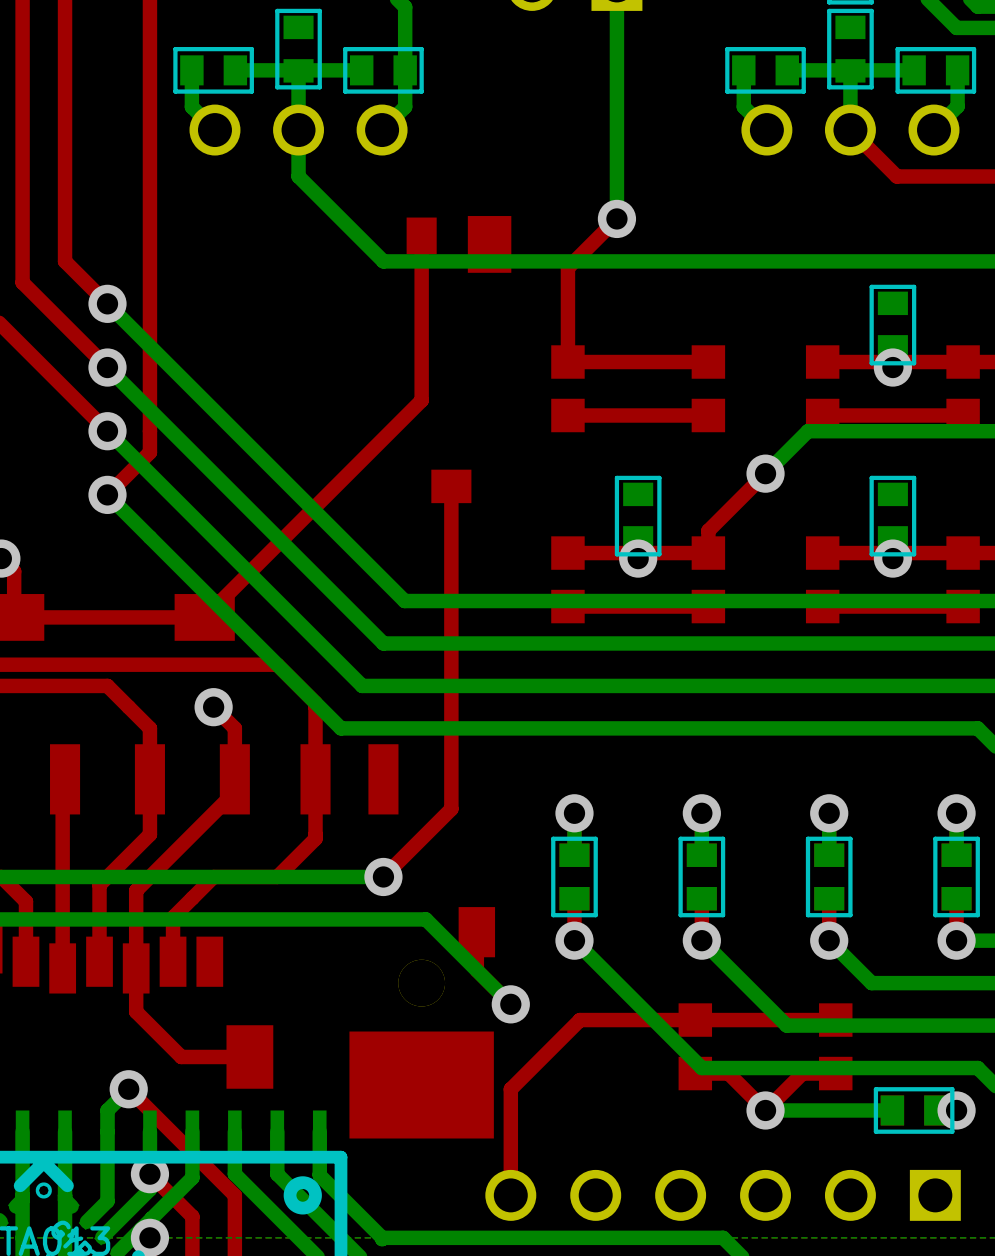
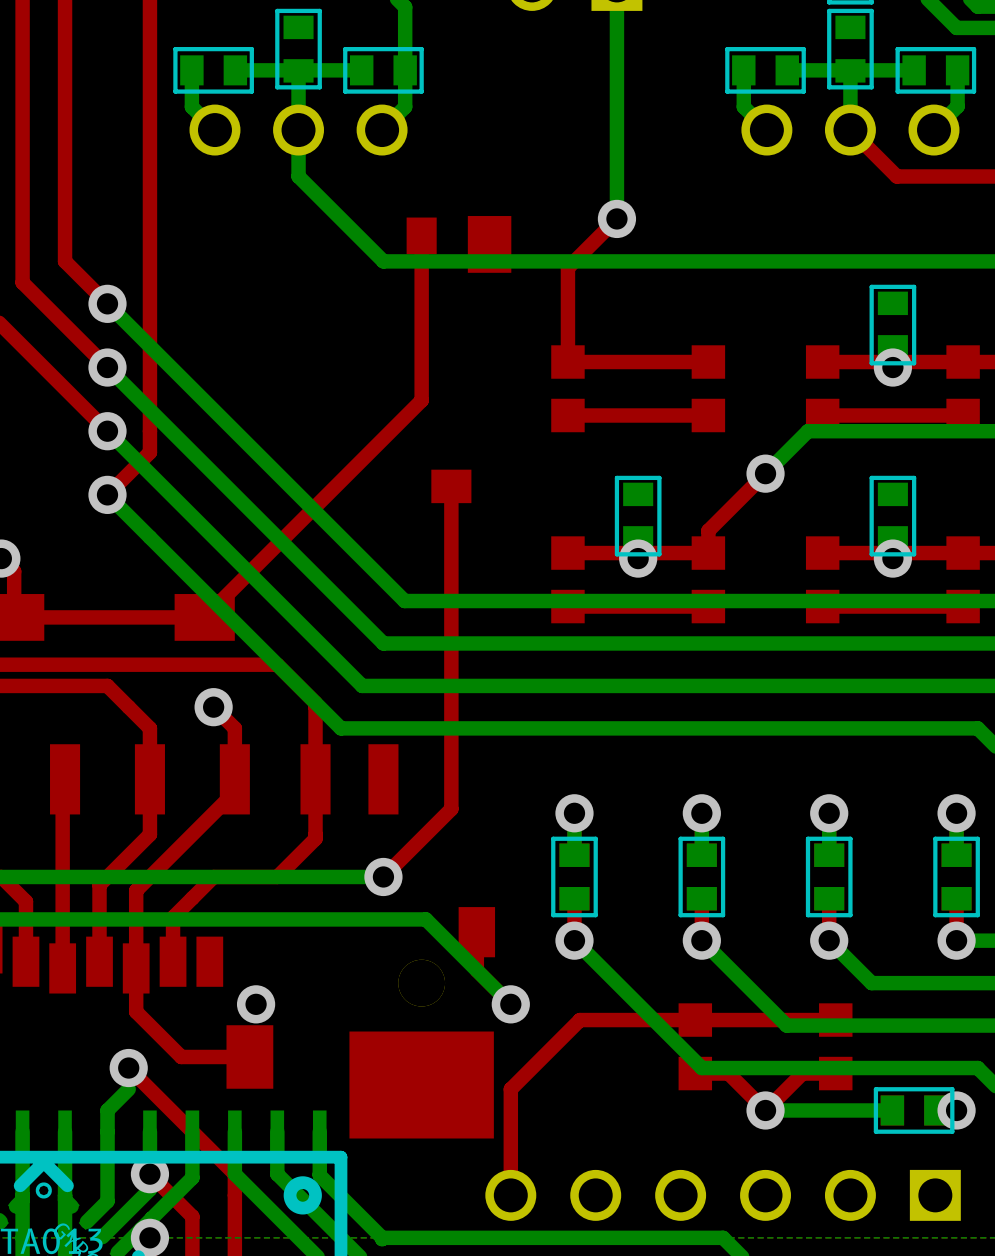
via: none -> (256, 1004)
top track: (128, 1089) (234, 1195) -> (128, 1068) (234, 1174) (234, 1195)
via position: (128, 1089) -> (128, 1068)

